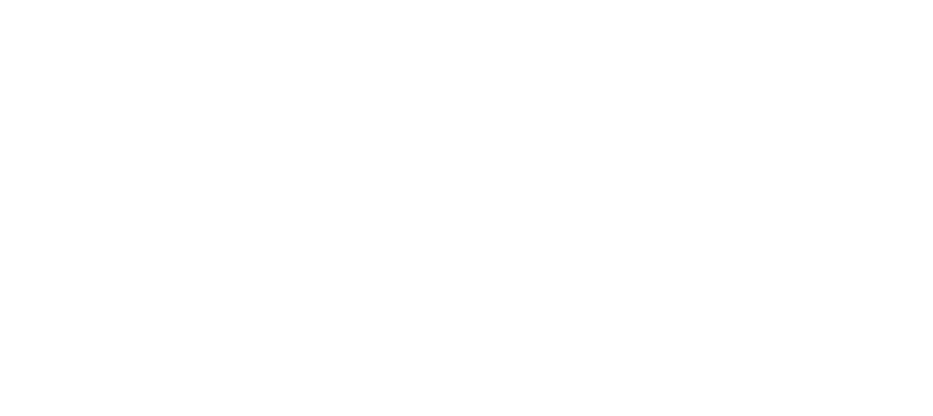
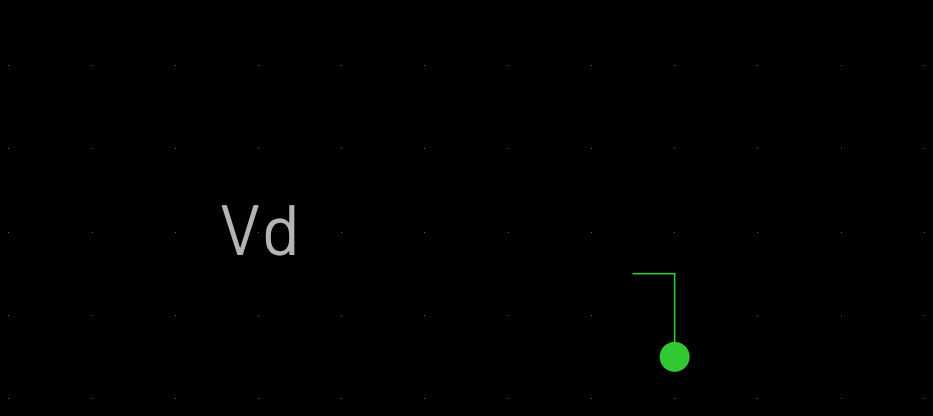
label: none -> Vd (257, 230)
wire: none -> (633, 273) (674, 273) (674, 356)
junction: none -> (674, 356)

